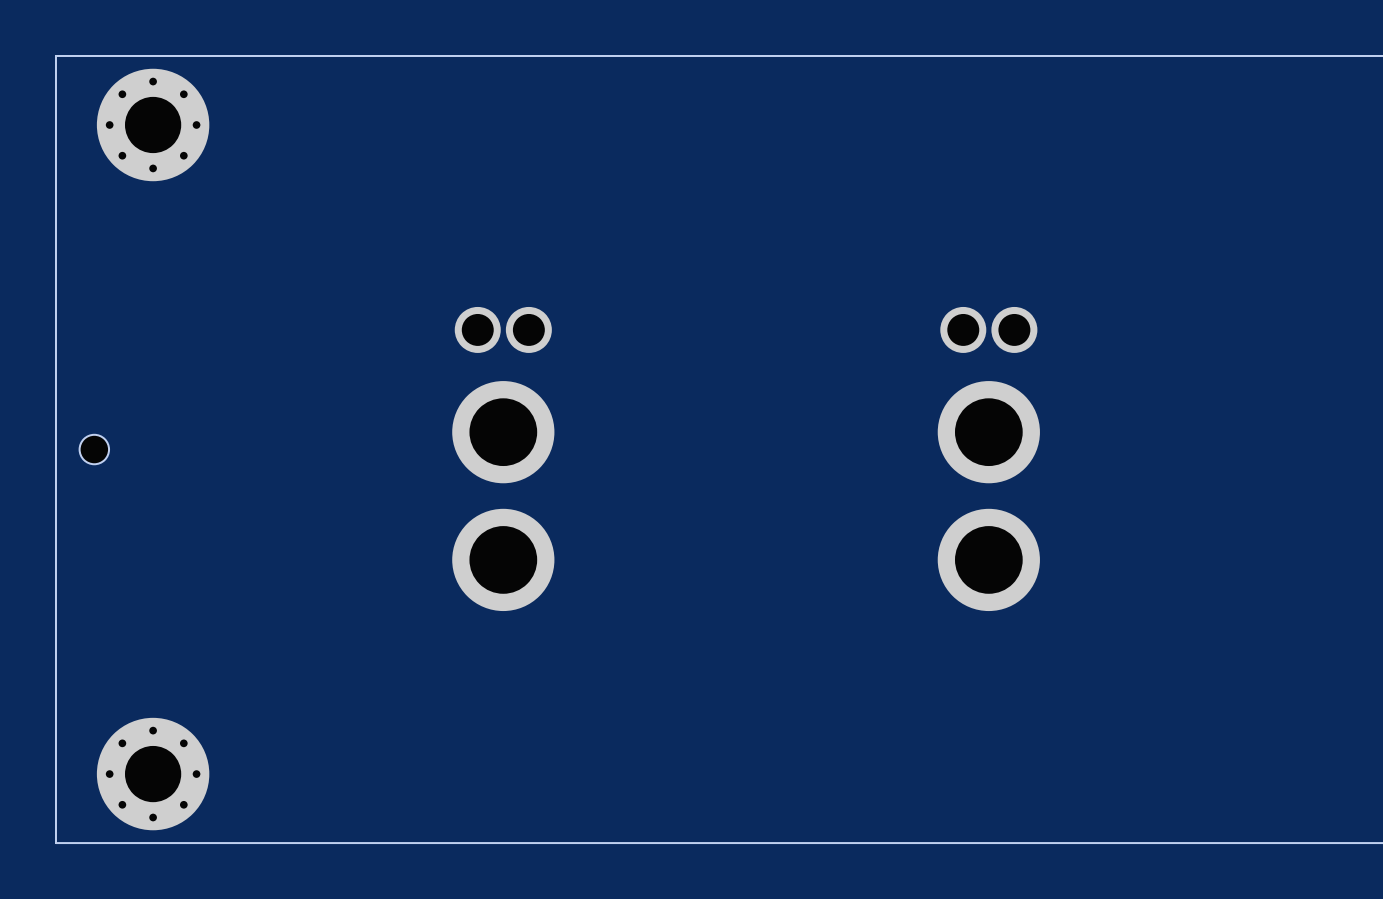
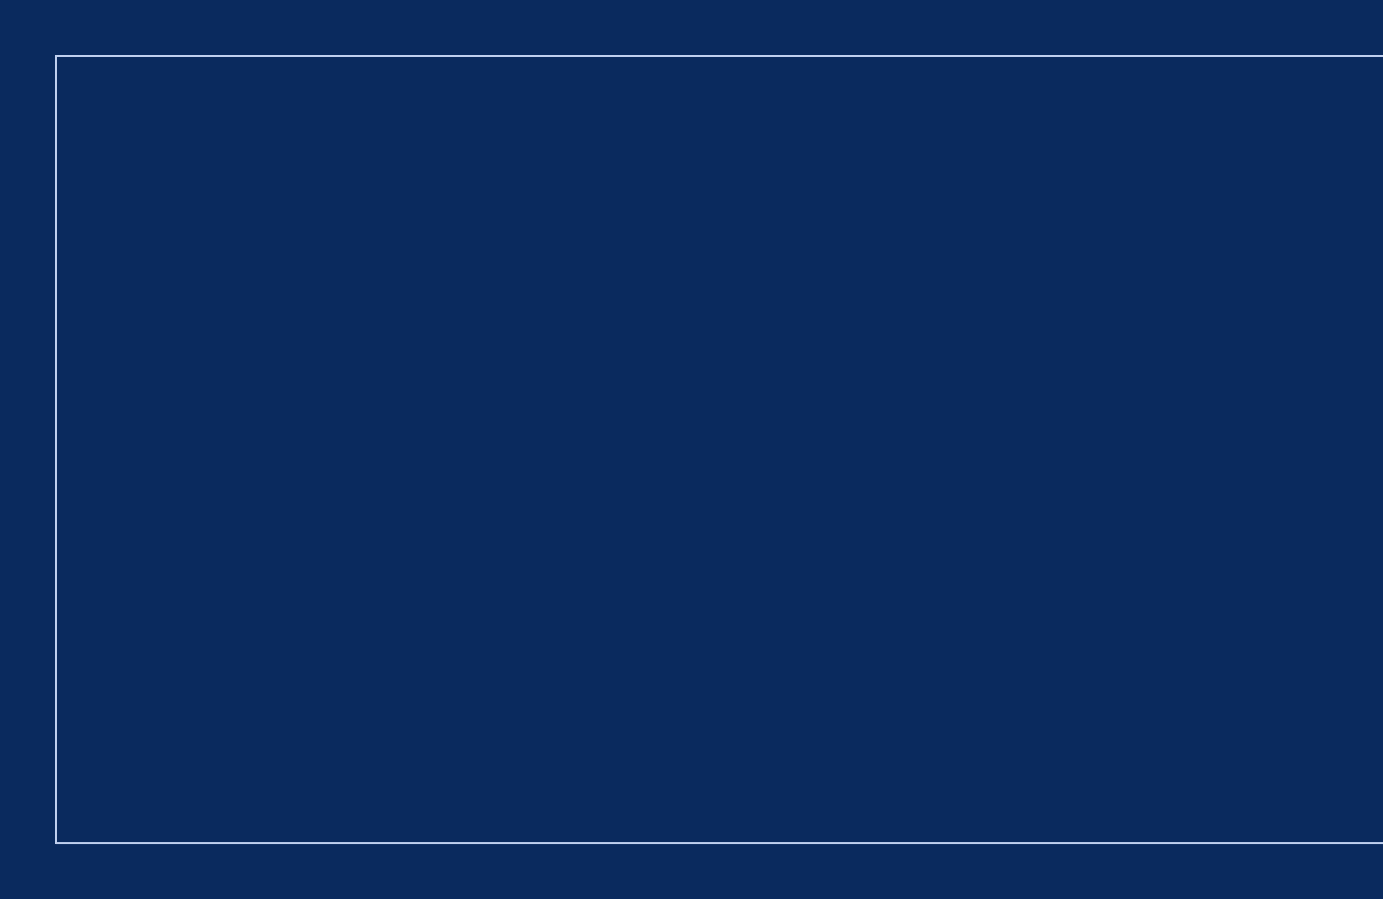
part: (153, 124) -> none
part: (94, 449) -> none
part: (503, 458) -> none
part: (988, 458) -> none
part: (153, 774) -> none

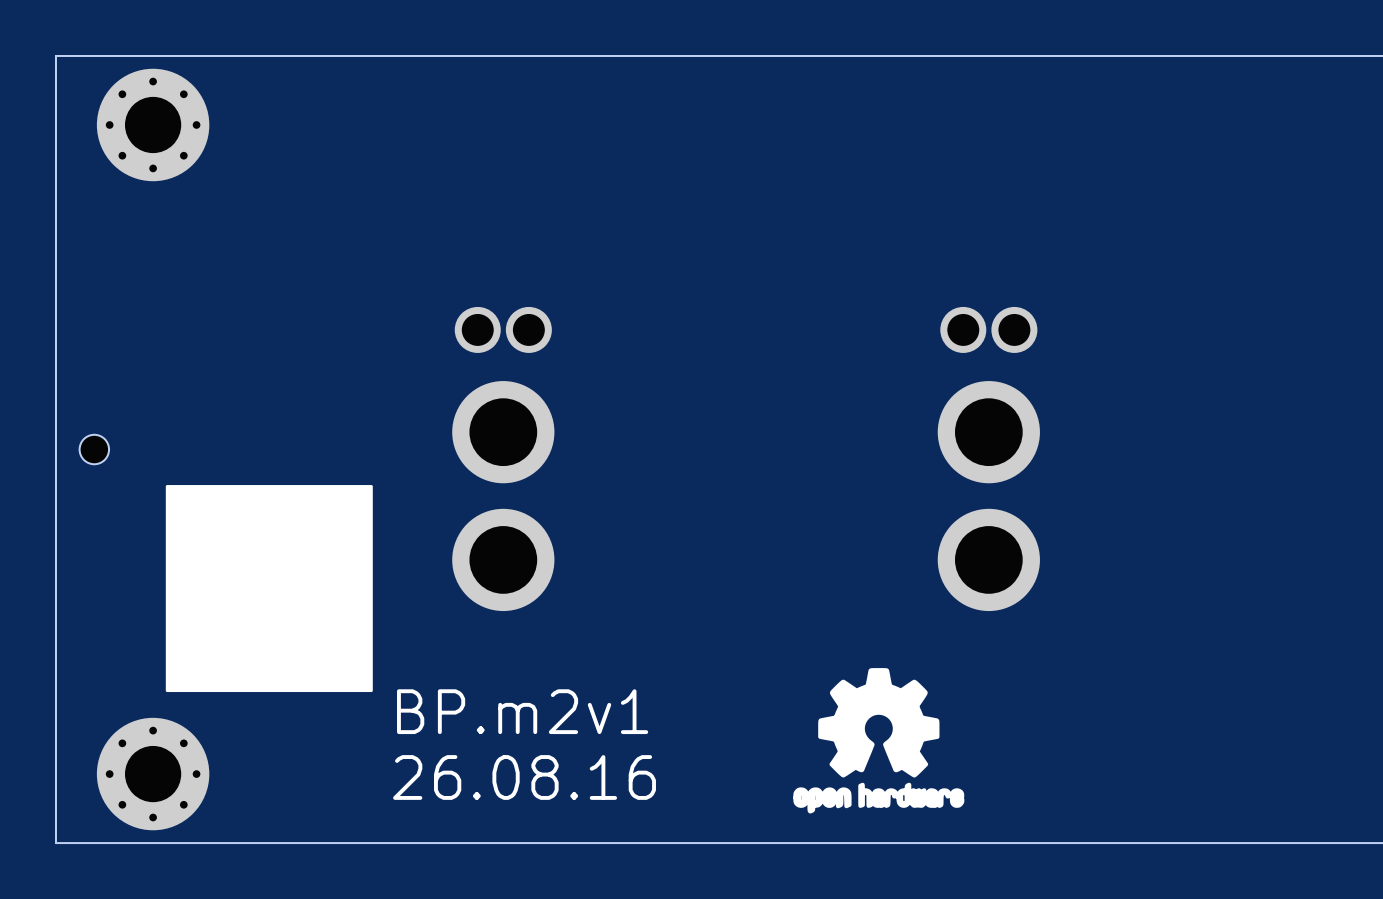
part: none -> (153, 124)
part: none -> (94, 449)
part: none -> (503, 458)
part: none -> (988, 458)
drawing: none -> [165, 485, 373, 693]
drawing: none -> [793, 668, 965, 814]
text: none -> BP.m2v1 (522, 711)
part: none -> (153, 774)
text: none -> 26.08.16 (524, 777)

